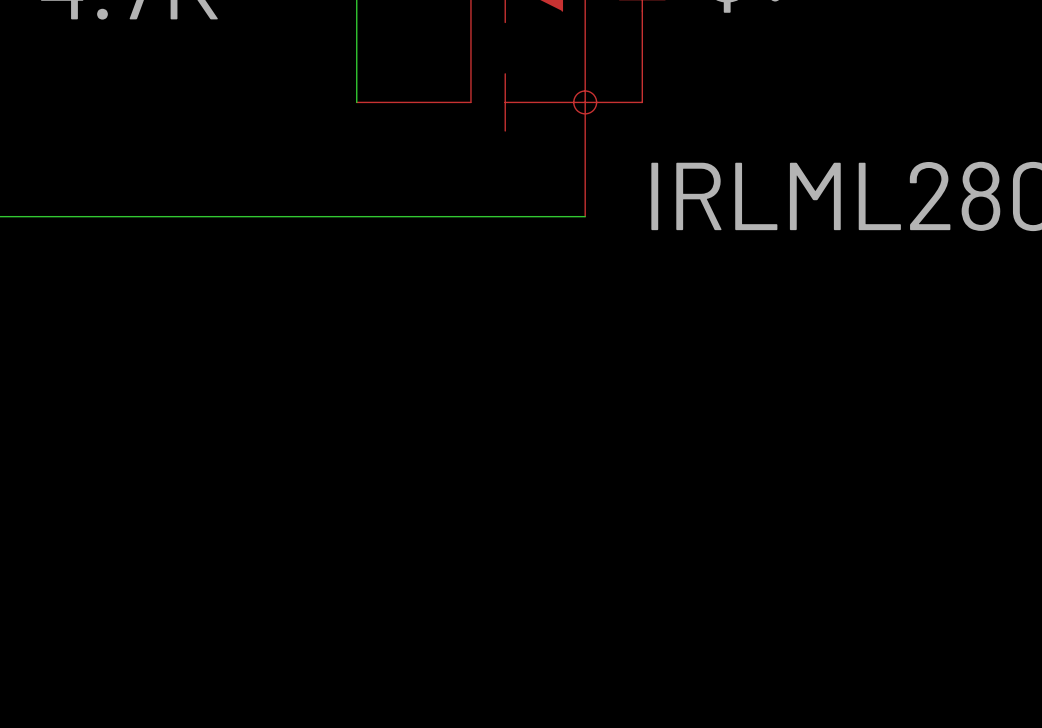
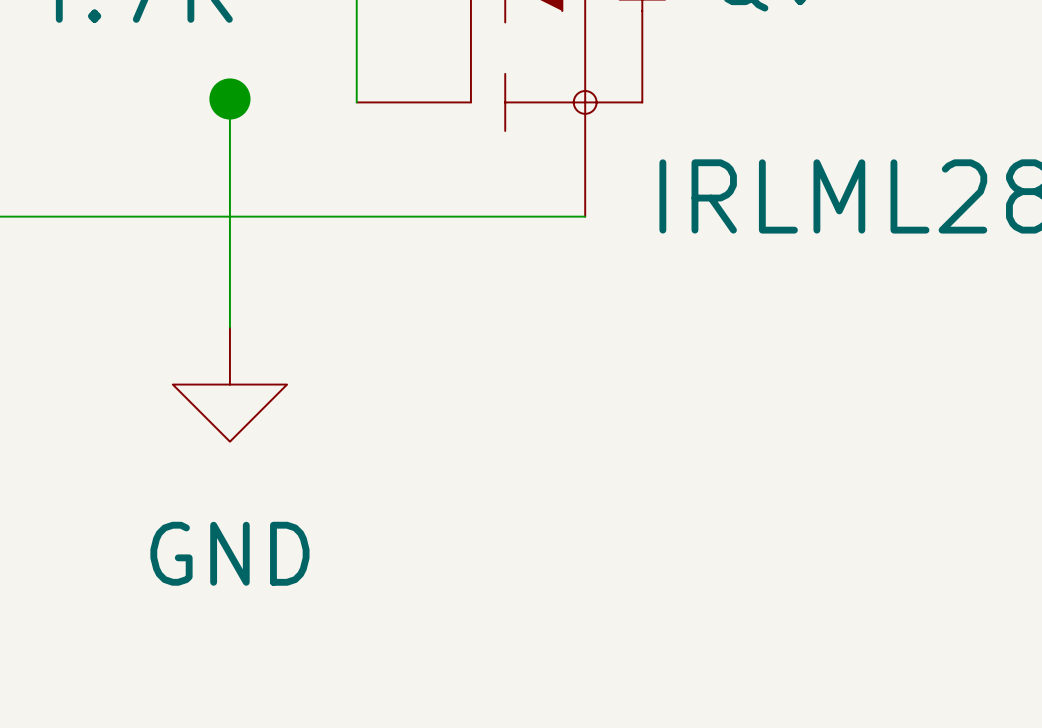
wire: none -> (229, 99) (229, 327)
junction: none -> (229, 99)
power symbol: none -> GND (229, 384)

